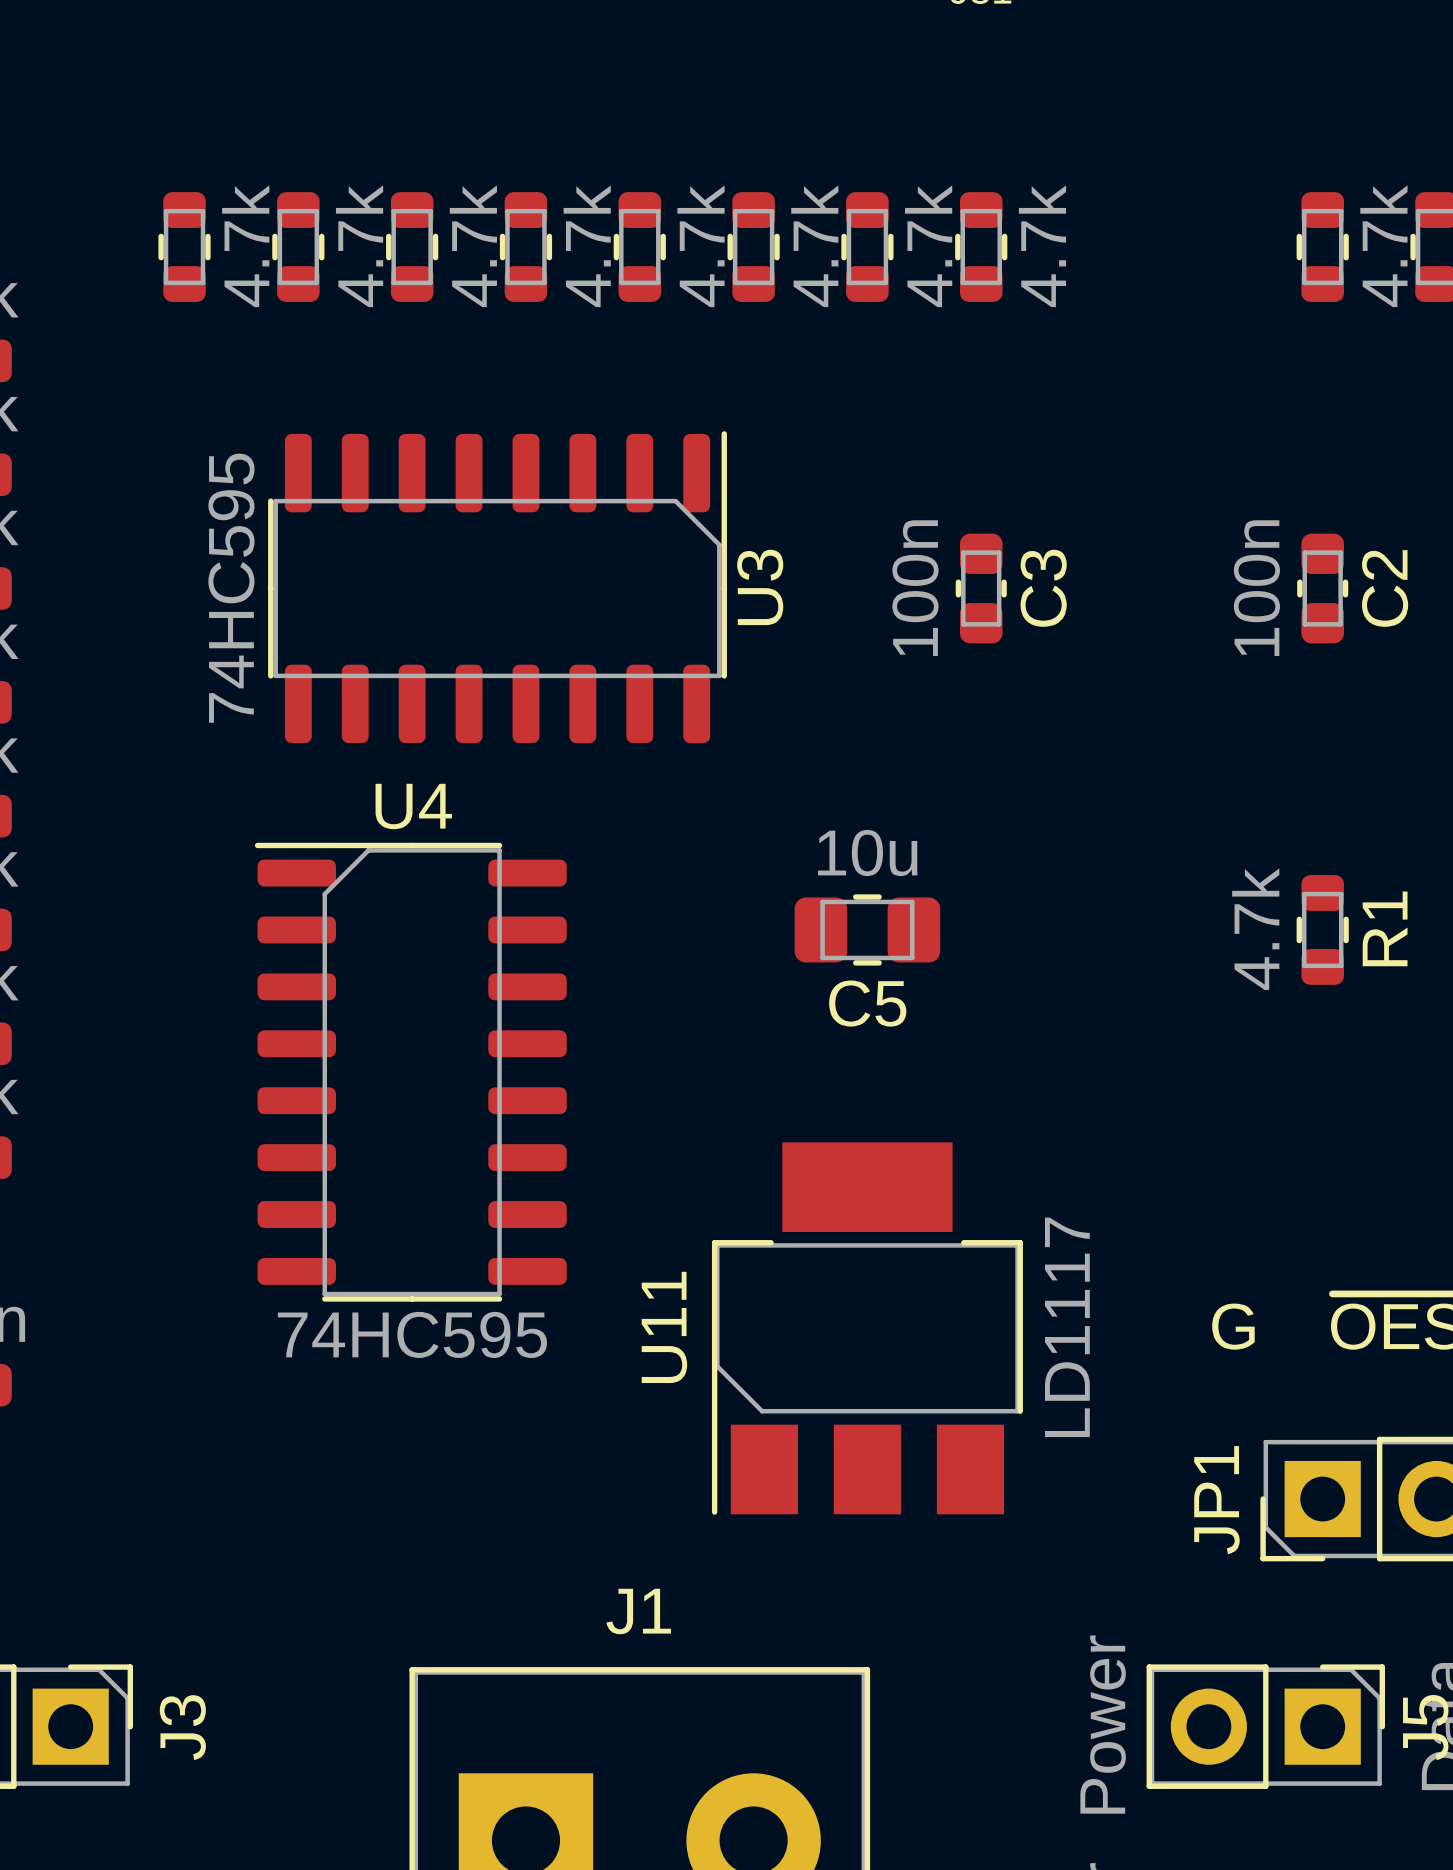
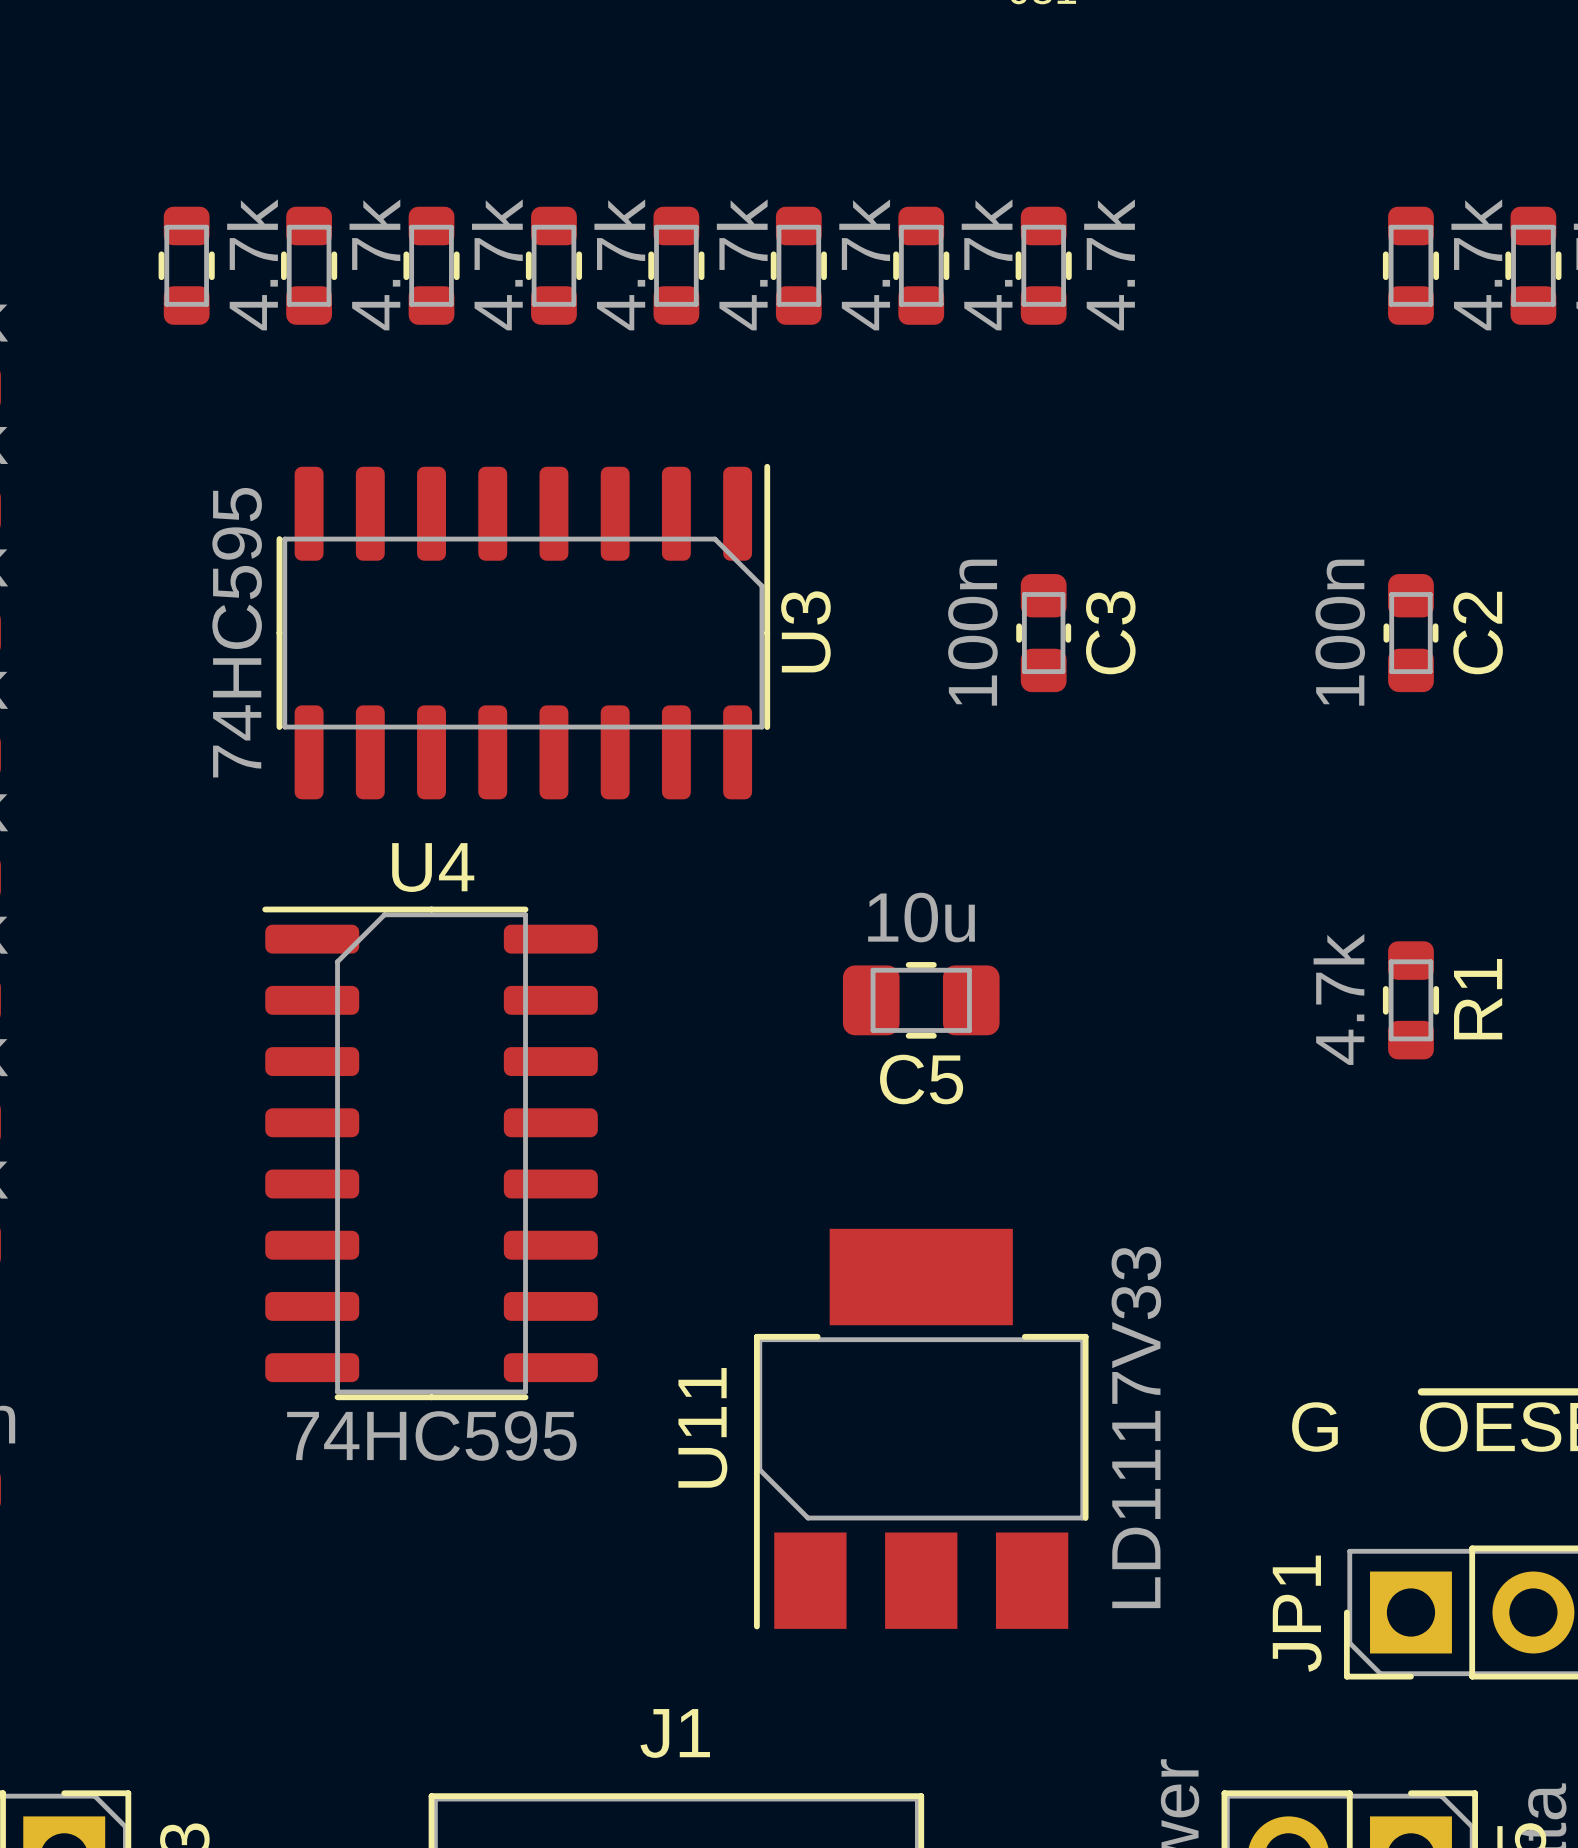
U3 footprint: [268, 431, 727, 744] -> [276, 463, 771, 800]
U4 footprint: [254, 842, 567, 1302] -> [262, 906, 598, 1401]
U11 value: LD1117 (1067, 1327) -> LD1117V33 (1136, 1427)

